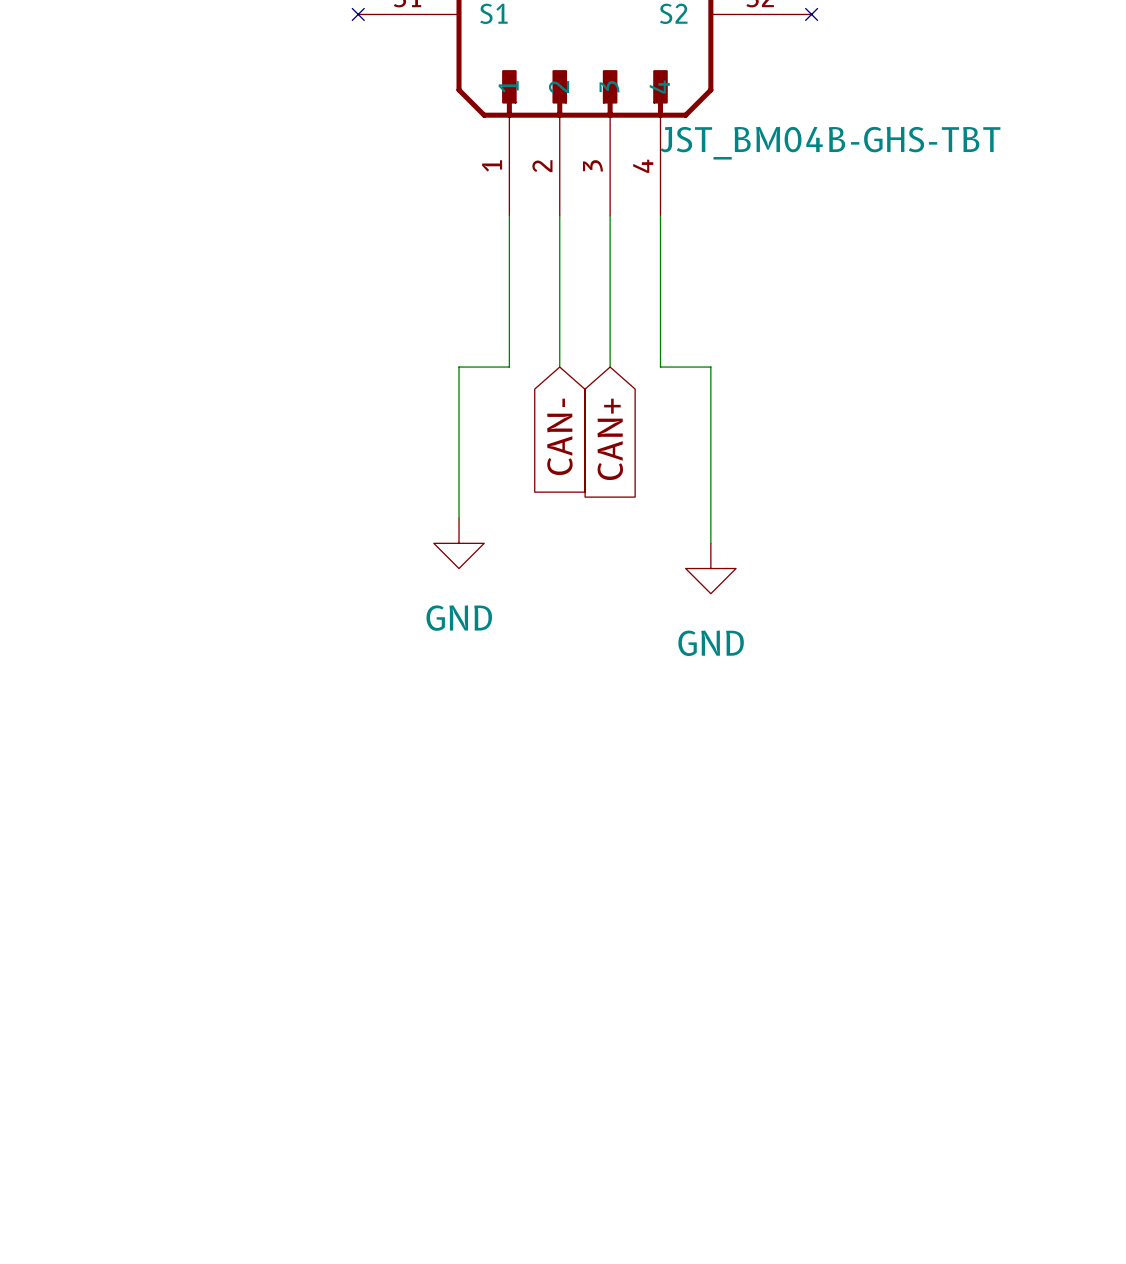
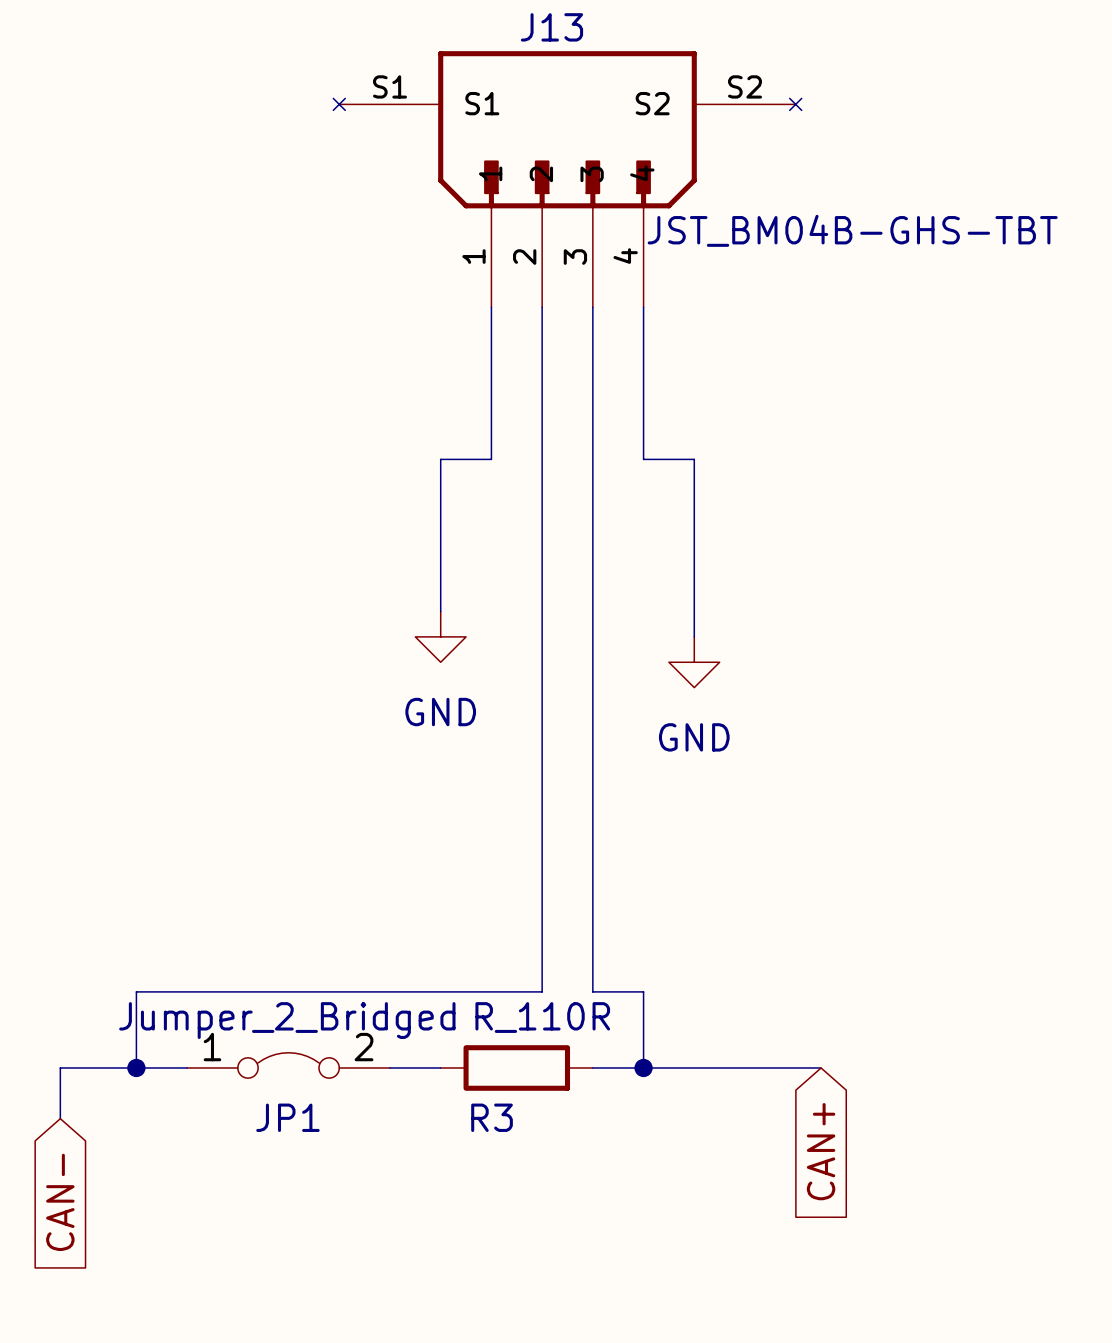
wire: none -> (542, 459) (542, 991) (136, 991) (136, 1067)
wire: none -> (592, 459) (592, 991) (643, 991) (643, 1067)
global label: CAN- (559, 436) -> none
global label: CAN+ (610, 439) -> none
JP1: none -> Jumper_2_Bridged (288, 1065)
junction: none -> (136, 1067)
wire: none -> (187, 1067) (60, 1067) (60, 1118)
wire: none -> (389, 1067) (440, 1067)
R3: none -> R_110R (516, 1067)
wire: none -> (592, 1067) (821, 1067)
junction: none -> (643, 1067)
global label: none -> CAN+ (821, 1151)
global label: none -> CAN- (60, 1202)

